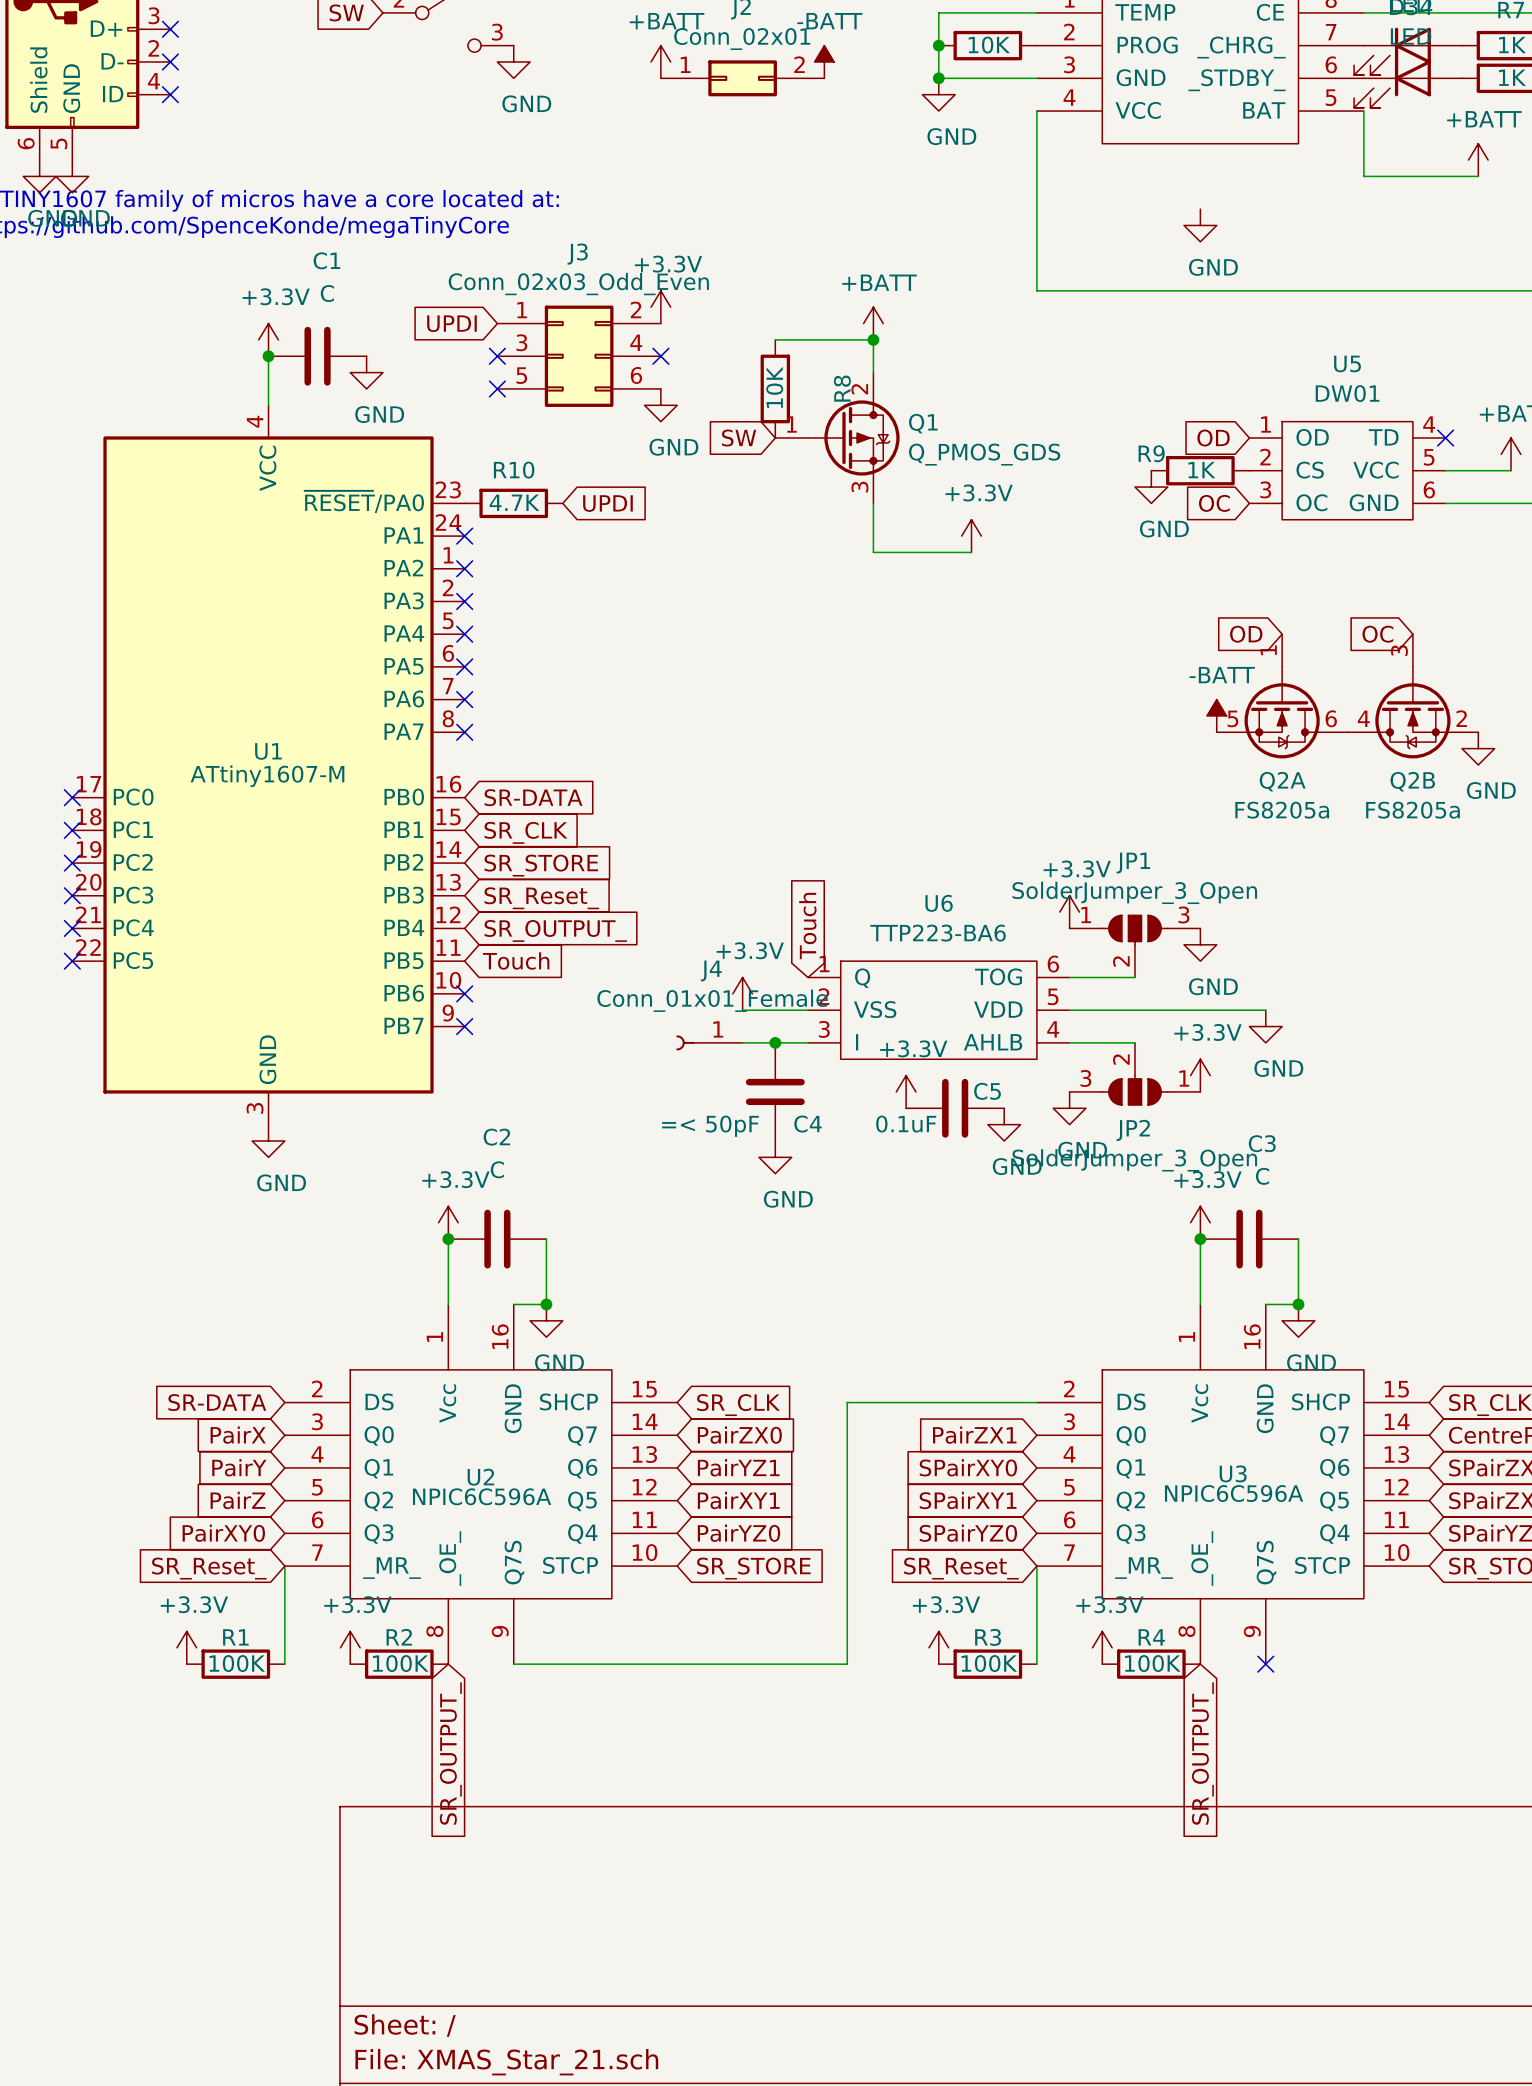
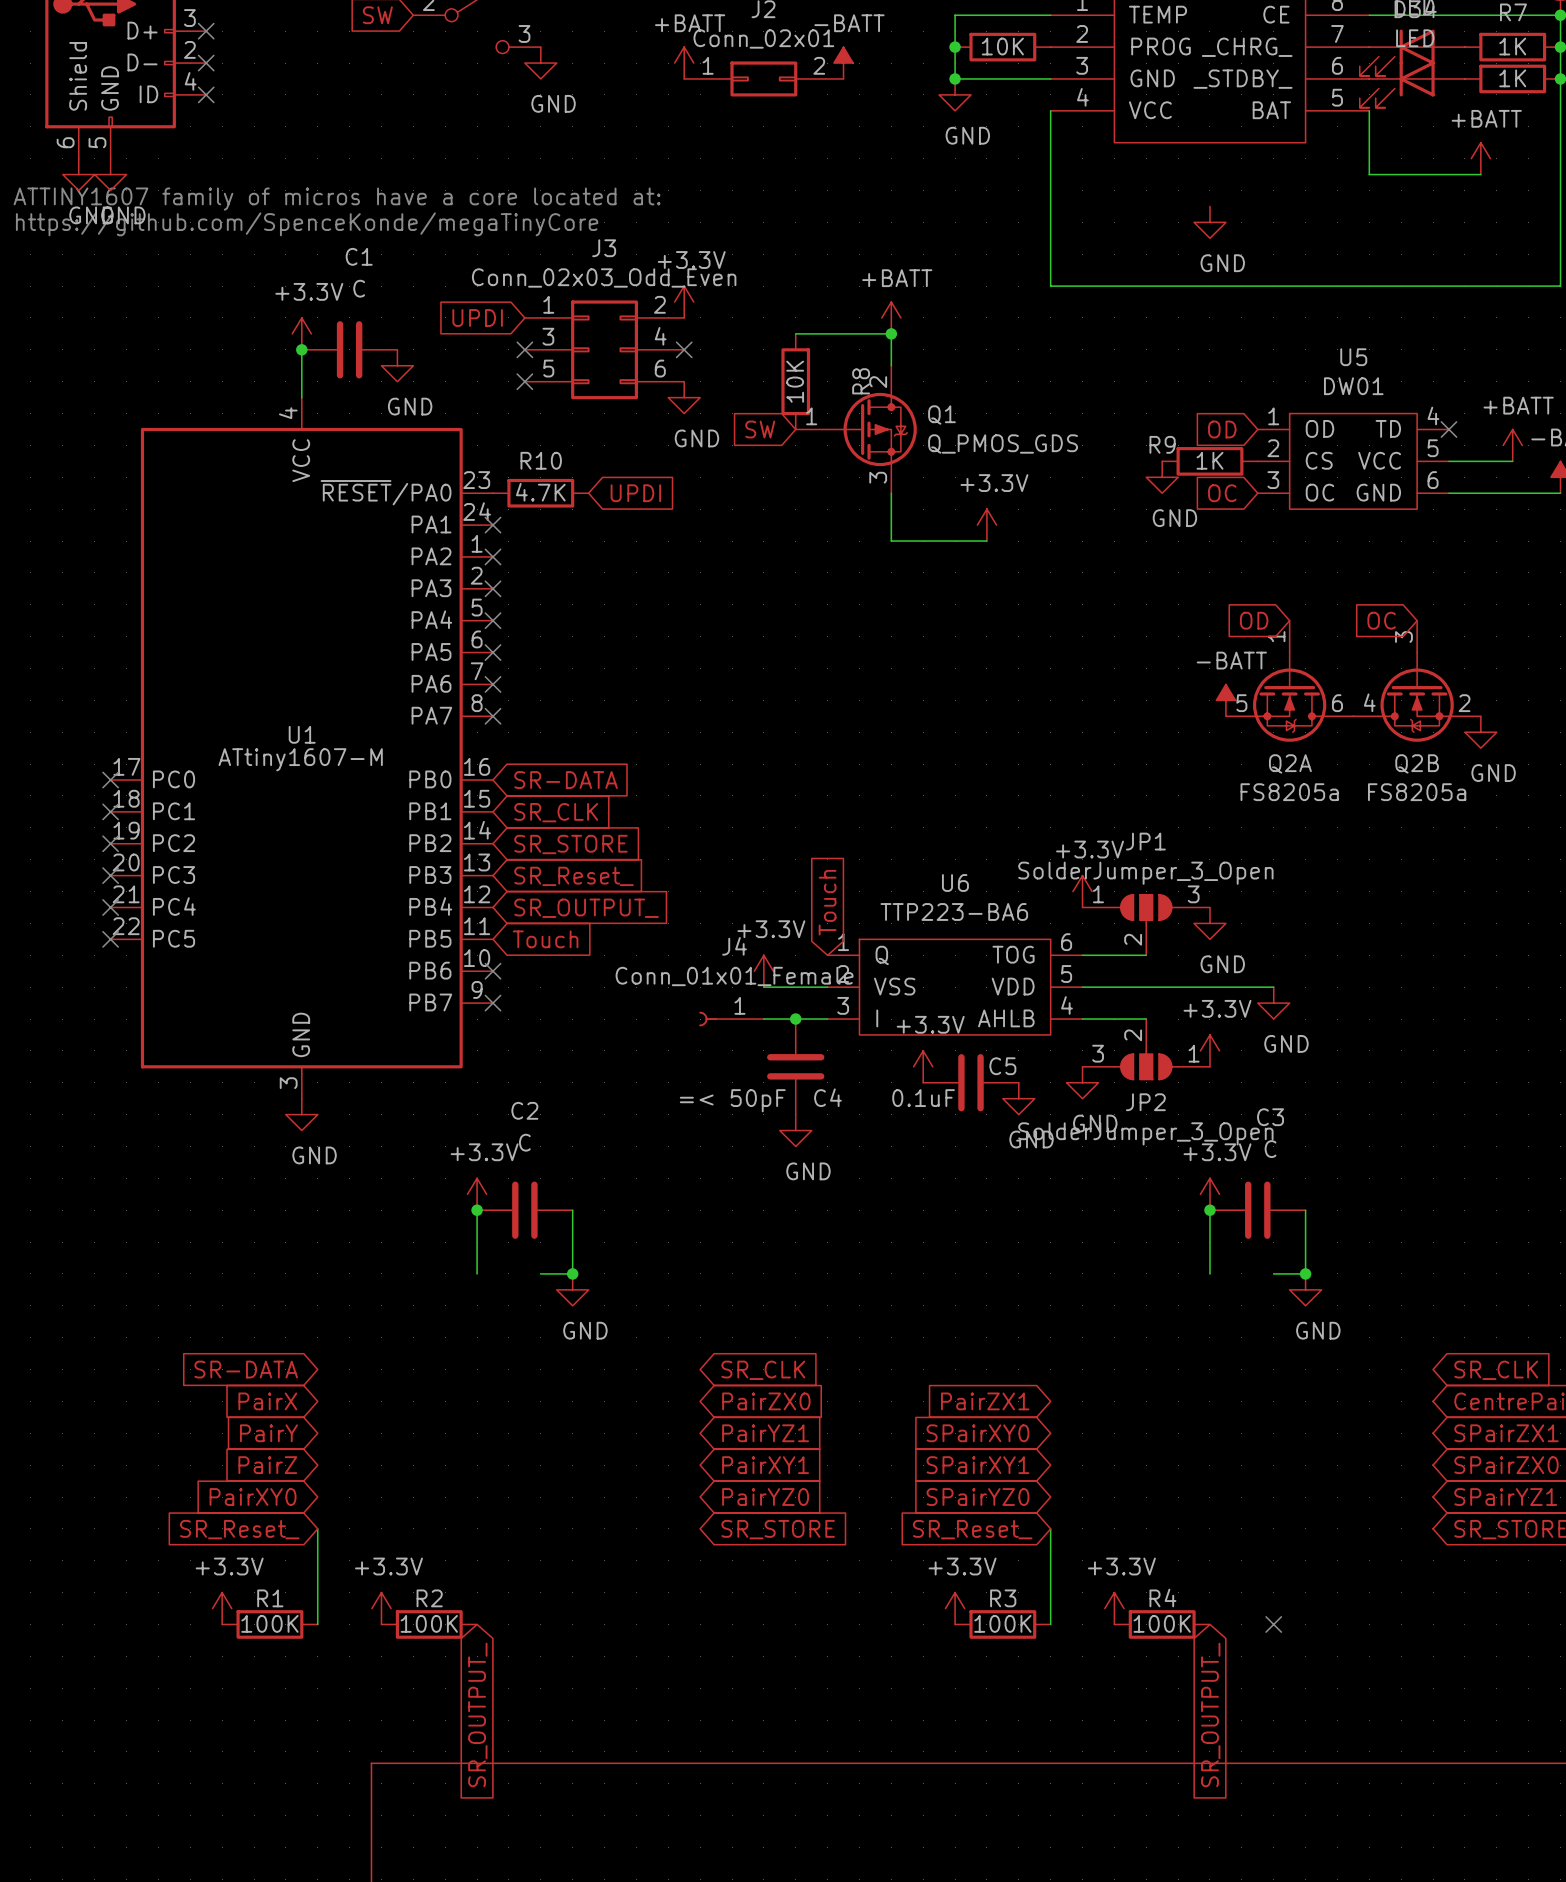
wire: (1036, 1402) (847, 1402) (847, 1664) (513, 1664) -> none
U2: NPIC6C596A (481, 1484) -> none
U3: NPIC6C596A (1233, 1484) -> none

